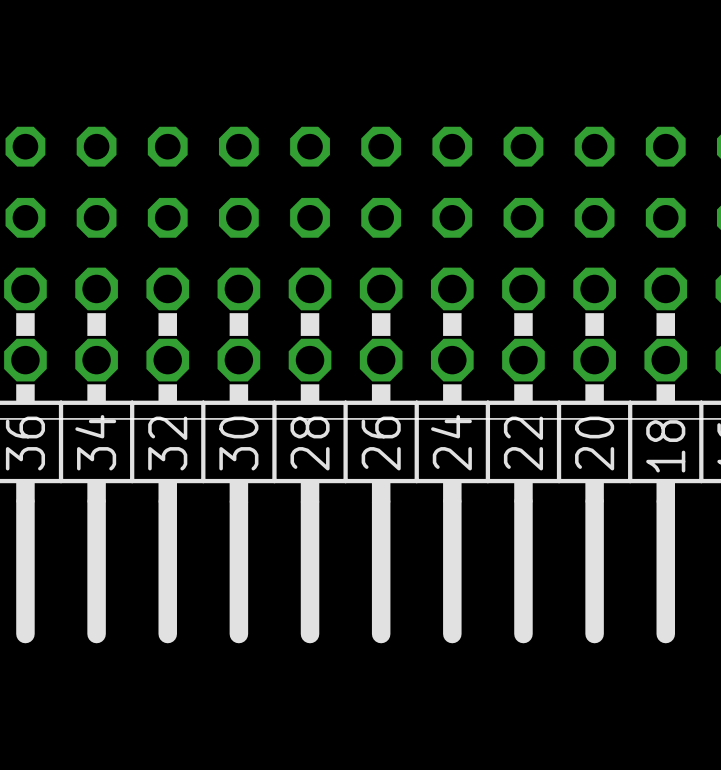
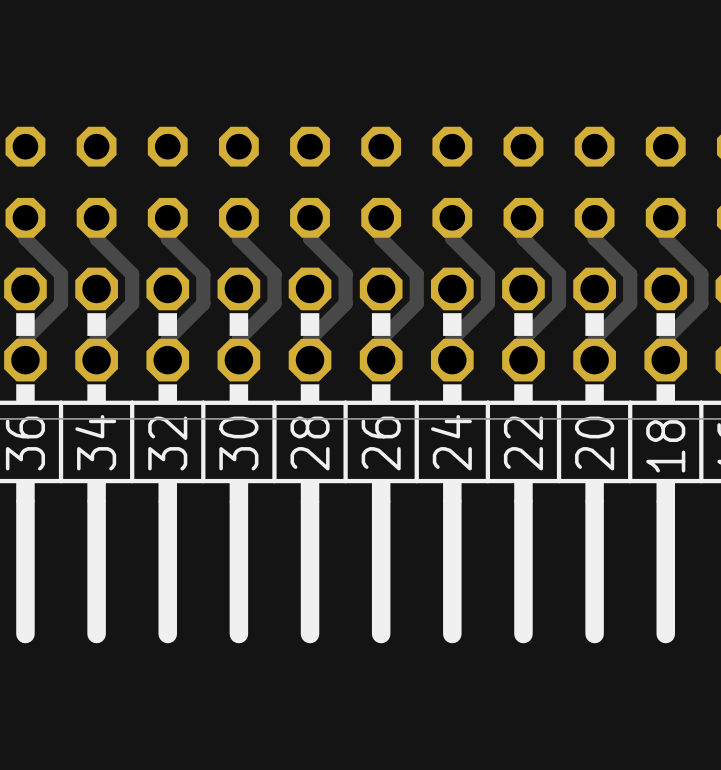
track: none -> (25, 217) (25, 238) (61, 274) (61, 303) (25, 339) (25, 360)
track: none -> (96, 217) (96, 238) (132, 274) (132, 303) (96, 339) (96, 360)
track: none -> (167, 217) (167, 238) (203, 274) (203, 303) (167, 339) (167, 360)
track: none -> (238, 217) (238, 238) (274, 274) (274, 303) (238, 339) (238, 360)
track: none -> (310, 217) (310, 238) (345, 274) (345, 303) (310, 339) (310, 360)
track: none -> (381, 217) (381, 238) (416, 274) (416, 303) (381, 339) (381, 360)
track: none -> (452, 217) (452, 238) (487, 274) (487, 303) (452, 339) (452, 360)
track: none -> (523, 217) (523, 238) (559, 274) (559, 303) (523, 339) (523, 360)
track: none -> (594, 217) (594, 238) (630, 274) (630, 303) (594, 339) (594, 360)
track: none -> (665, 217) (665, 238) (701, 274) (701, 303) (665, 339) (665, 360)

